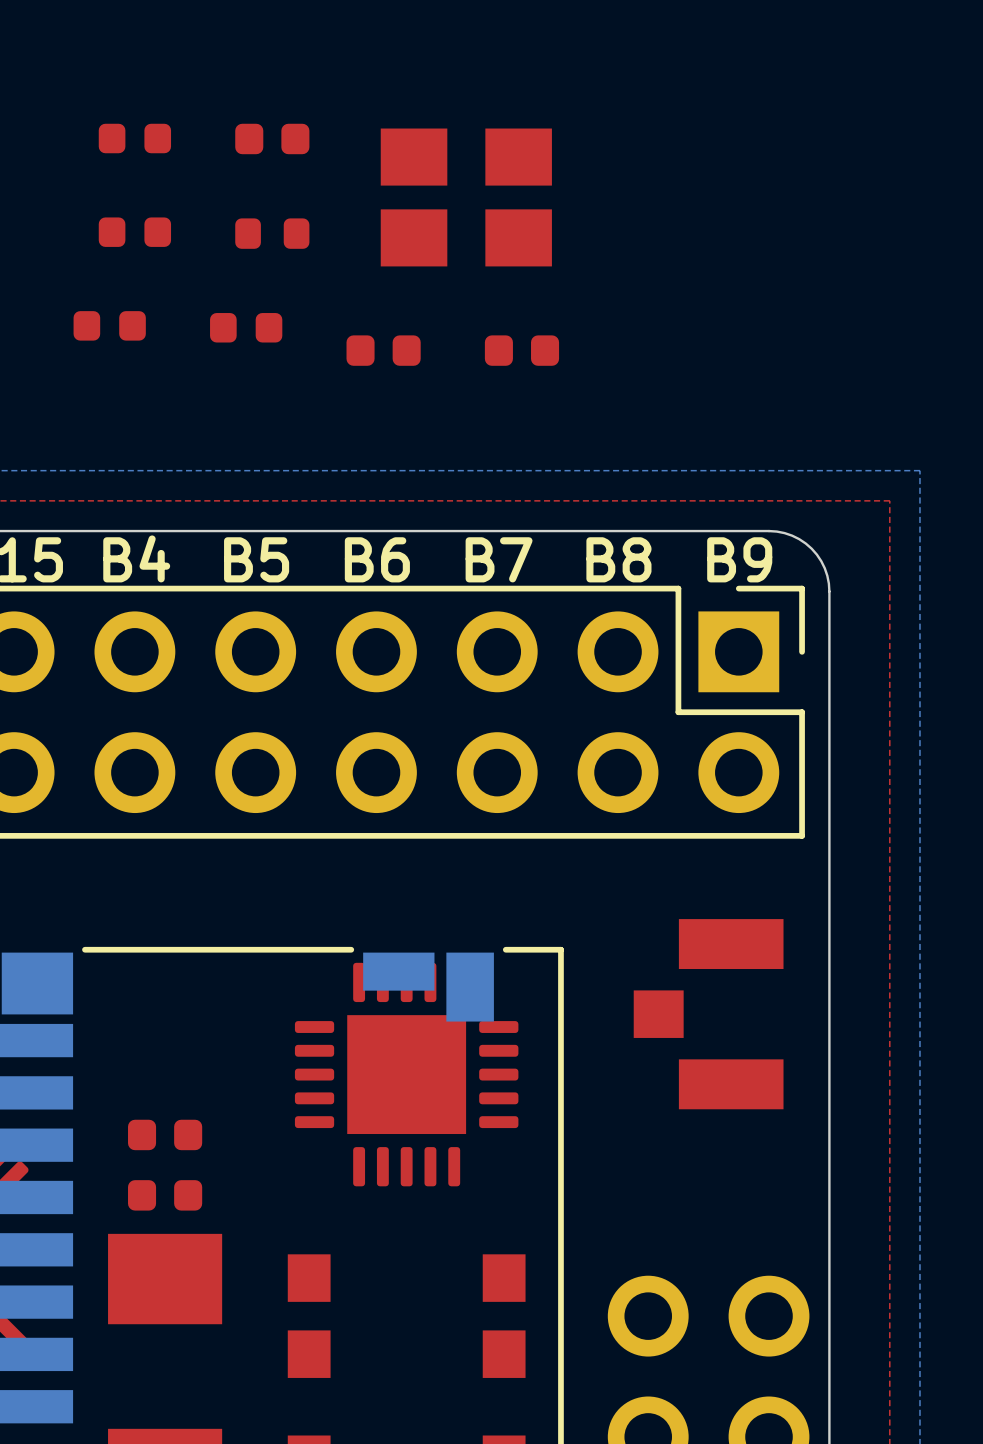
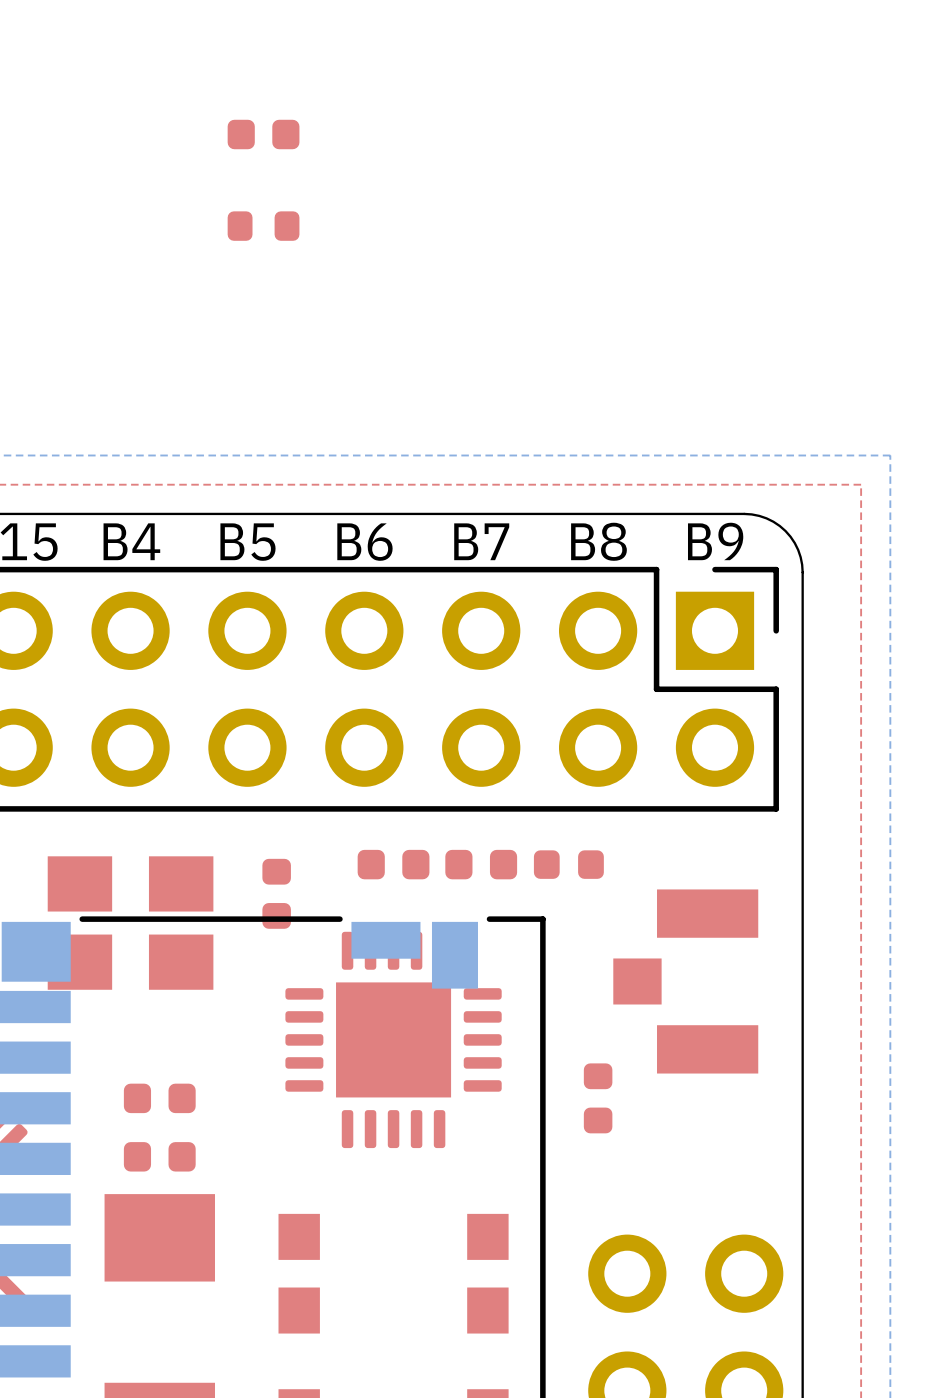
part: (134, 138) -> none
part position: (466, 197) -> (130, 923)
part: (134, 232) -> none
part: (109, 325) -> none
part: (246, 327) -> none
part: (383, 350) -> none
part: (521, 350) -> none
part: none -> (393, 864)
part: none -> (481, 864)
part: none -> (568, 864)
part: none -> (276, 893)
part: none -> (598, 1098)

